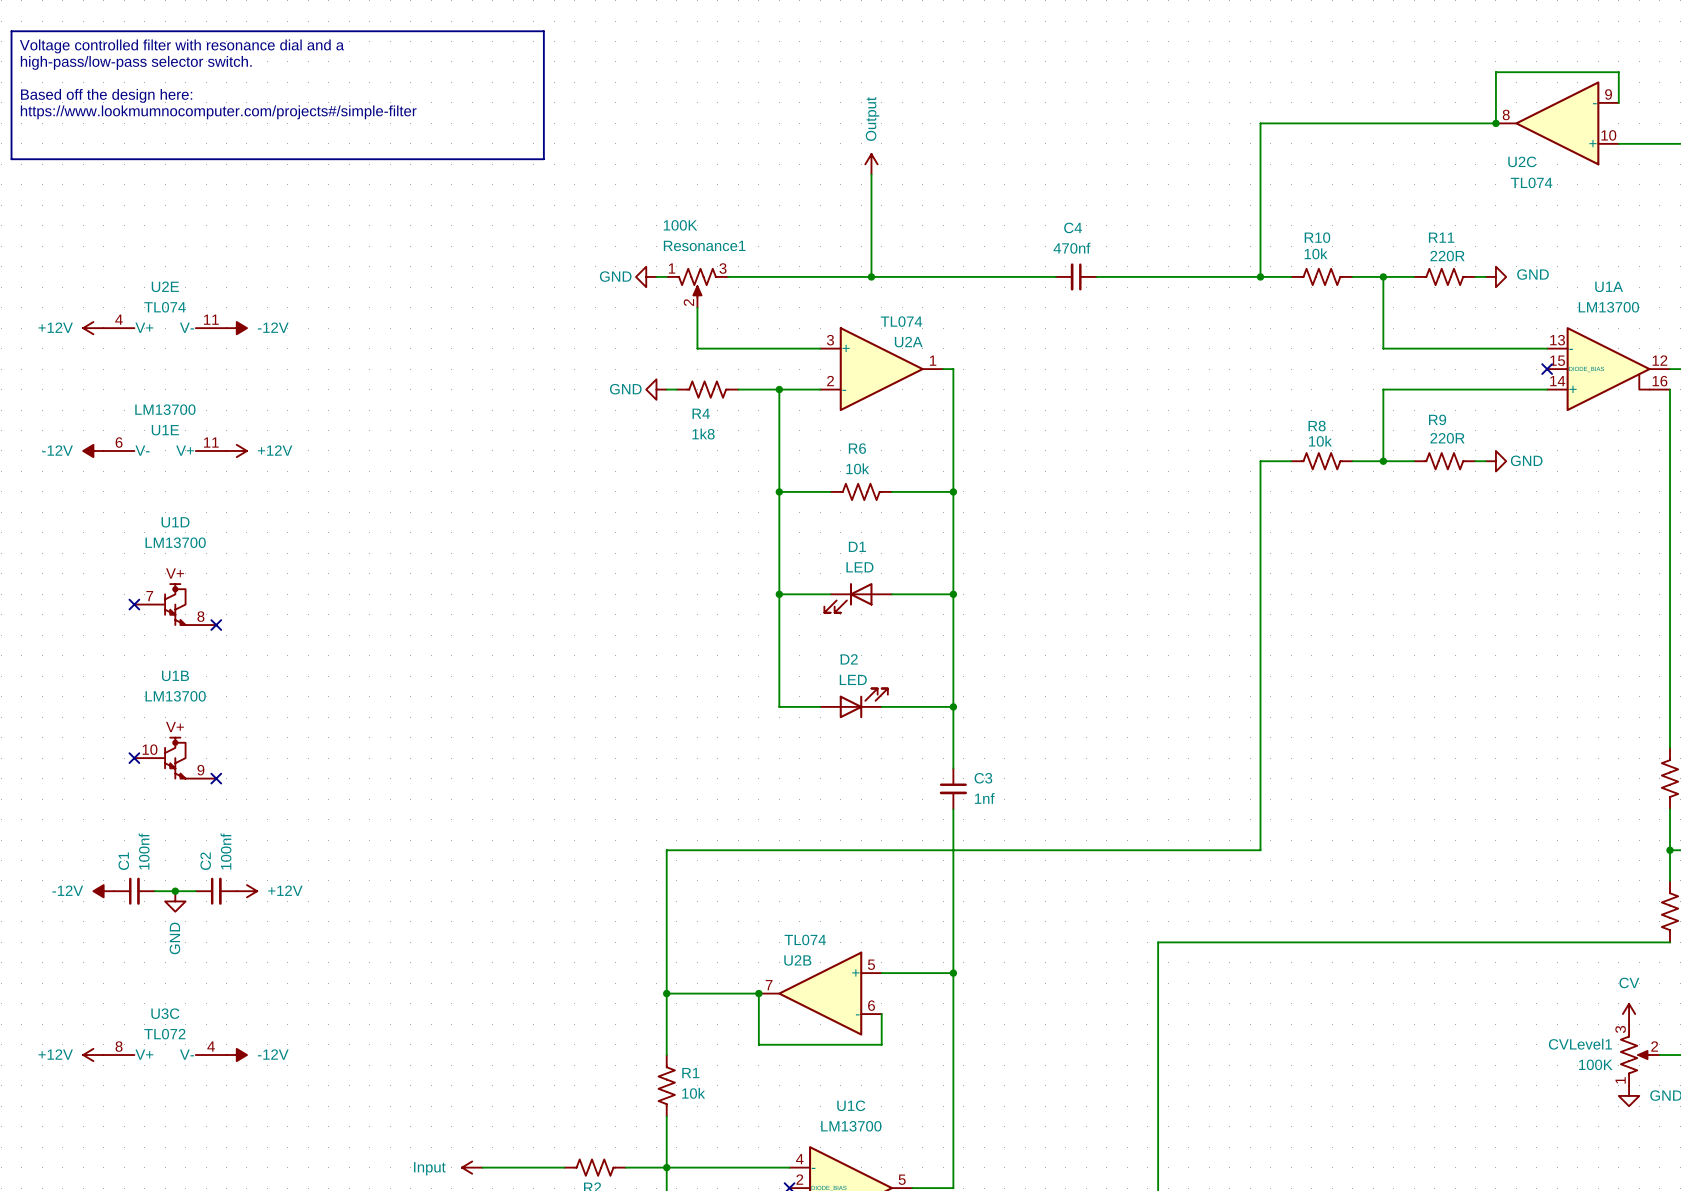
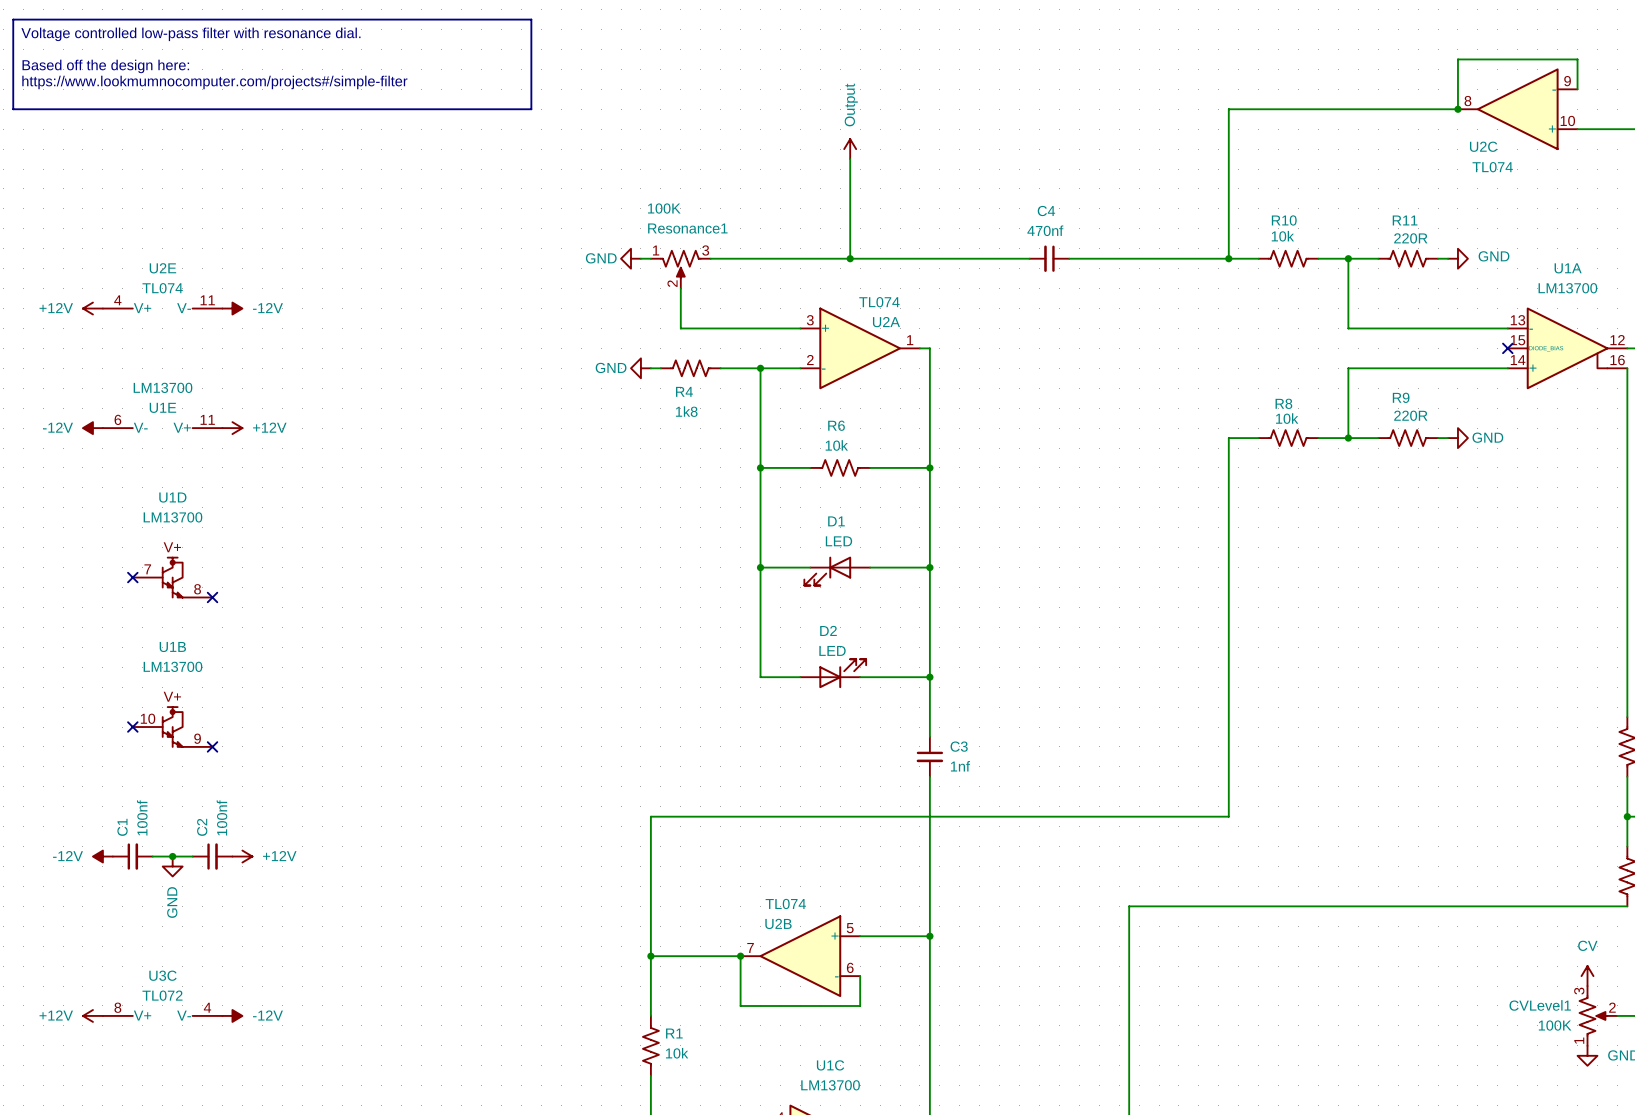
text: Voltage controlled filter with resonance dial and a (181, 46) -> Voltage controlled low-pass filter with resonance dial. (190, 34)
text: high-pass/low-pass selector switch. (136, 62) -> none
text: none -> Based off the design here: (105, 66)
text: Based off the design here: (106, 95) -> https://www.lookmumnocomputer.com/projects#/simple-filter (214, 82)
text: https://www.lookmumnocomputer.com/projects#/simple-filter (218, 112) -> none
line: (11, 123) (11, 159) (543, 159) (543, 123) -> (13, 109) (531, 109)

